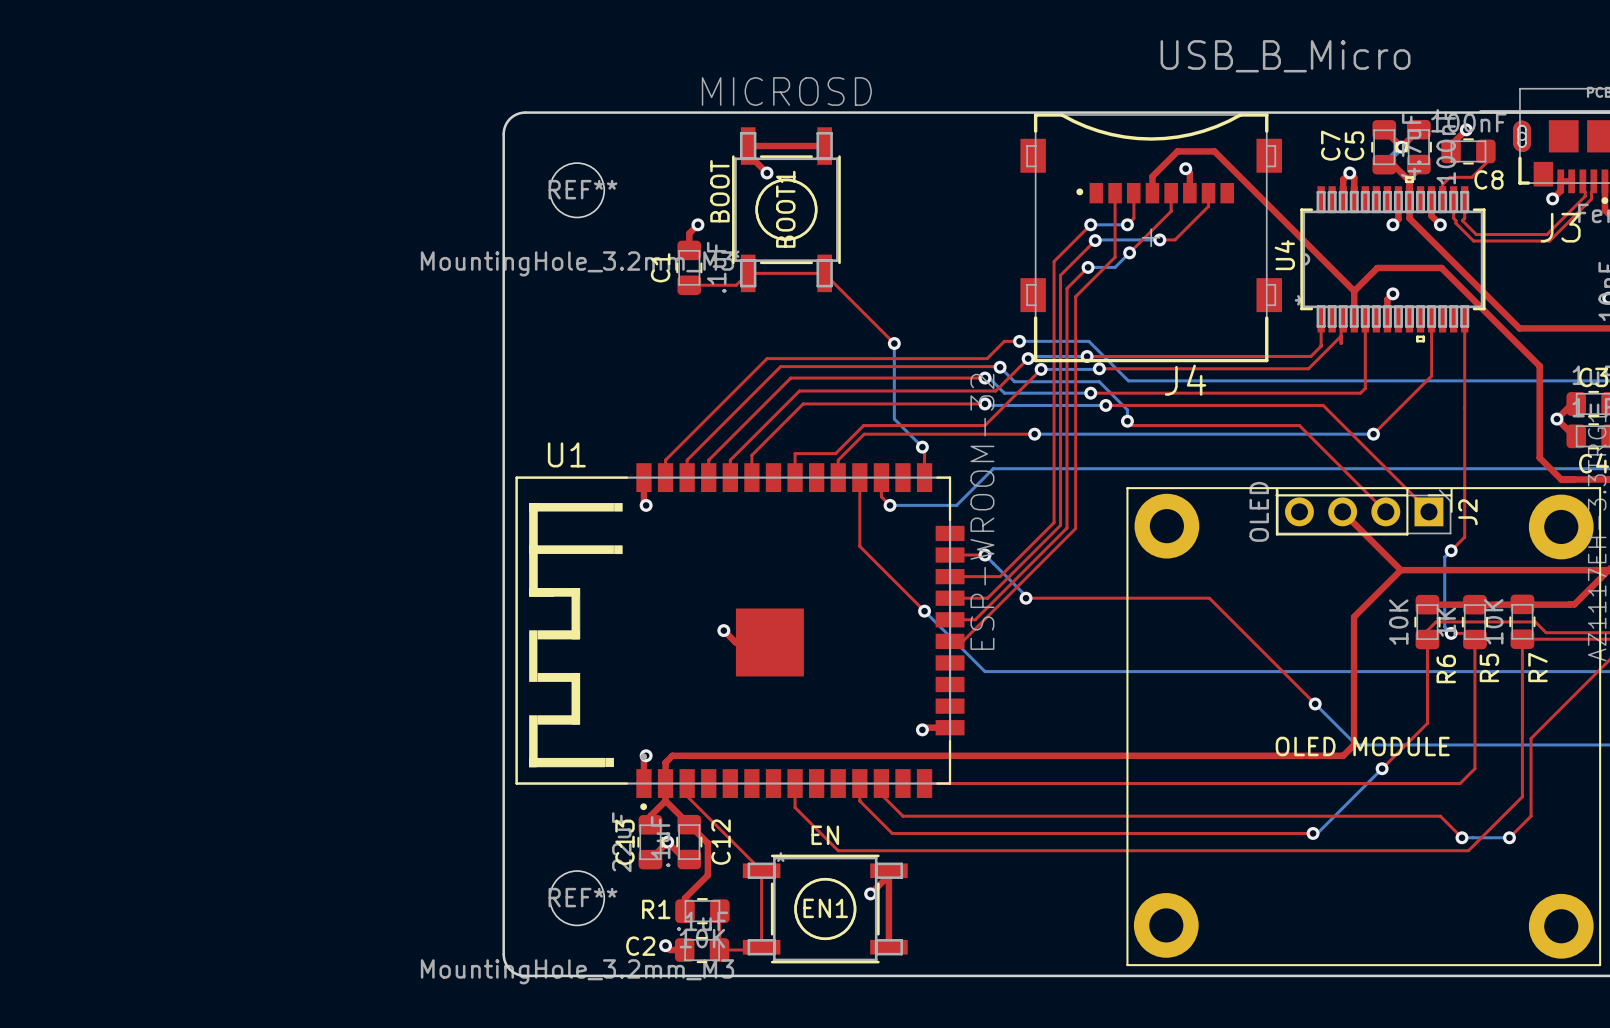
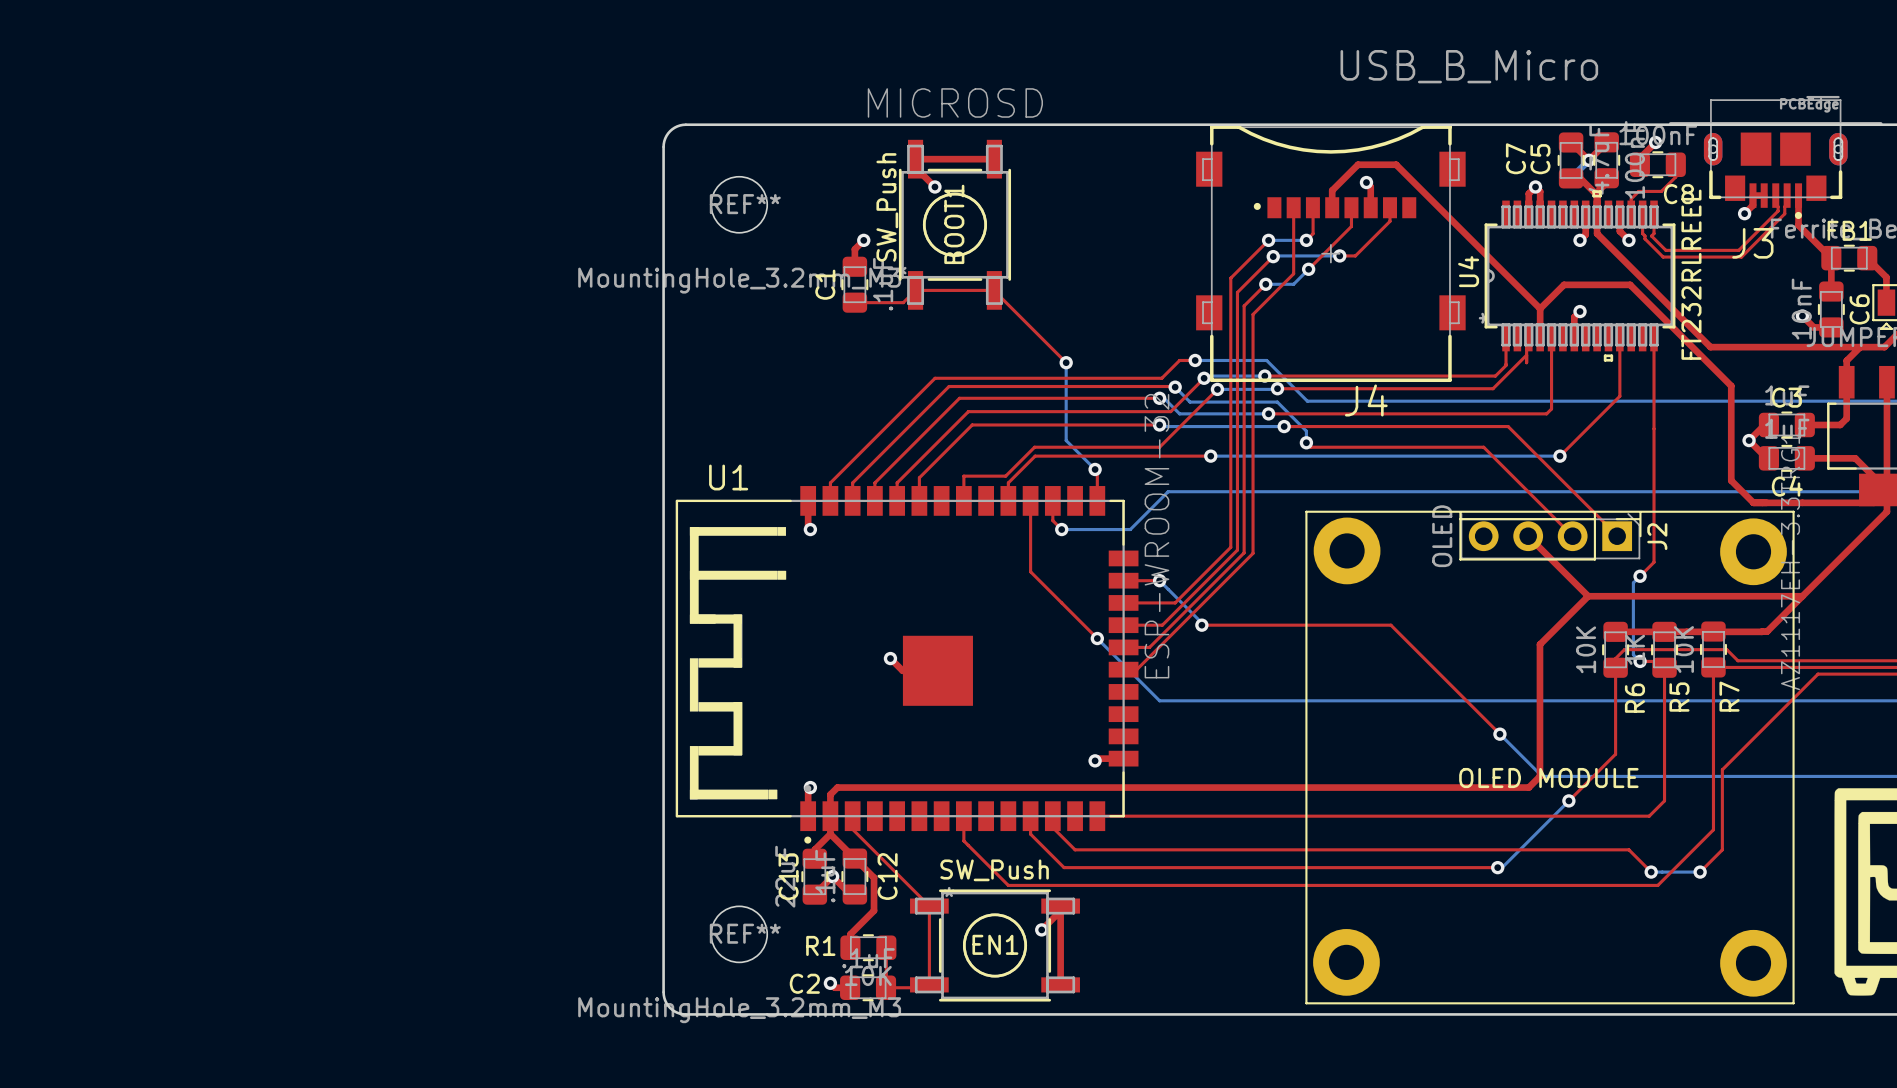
BOOT1 value: BOOT (719, 191) -> SW_Push (887, 207)
U4 value: none -> FT232RLREEL (1691, 274)
EN1 value: EN (825, 835) -> SW_Push (994, 870)

